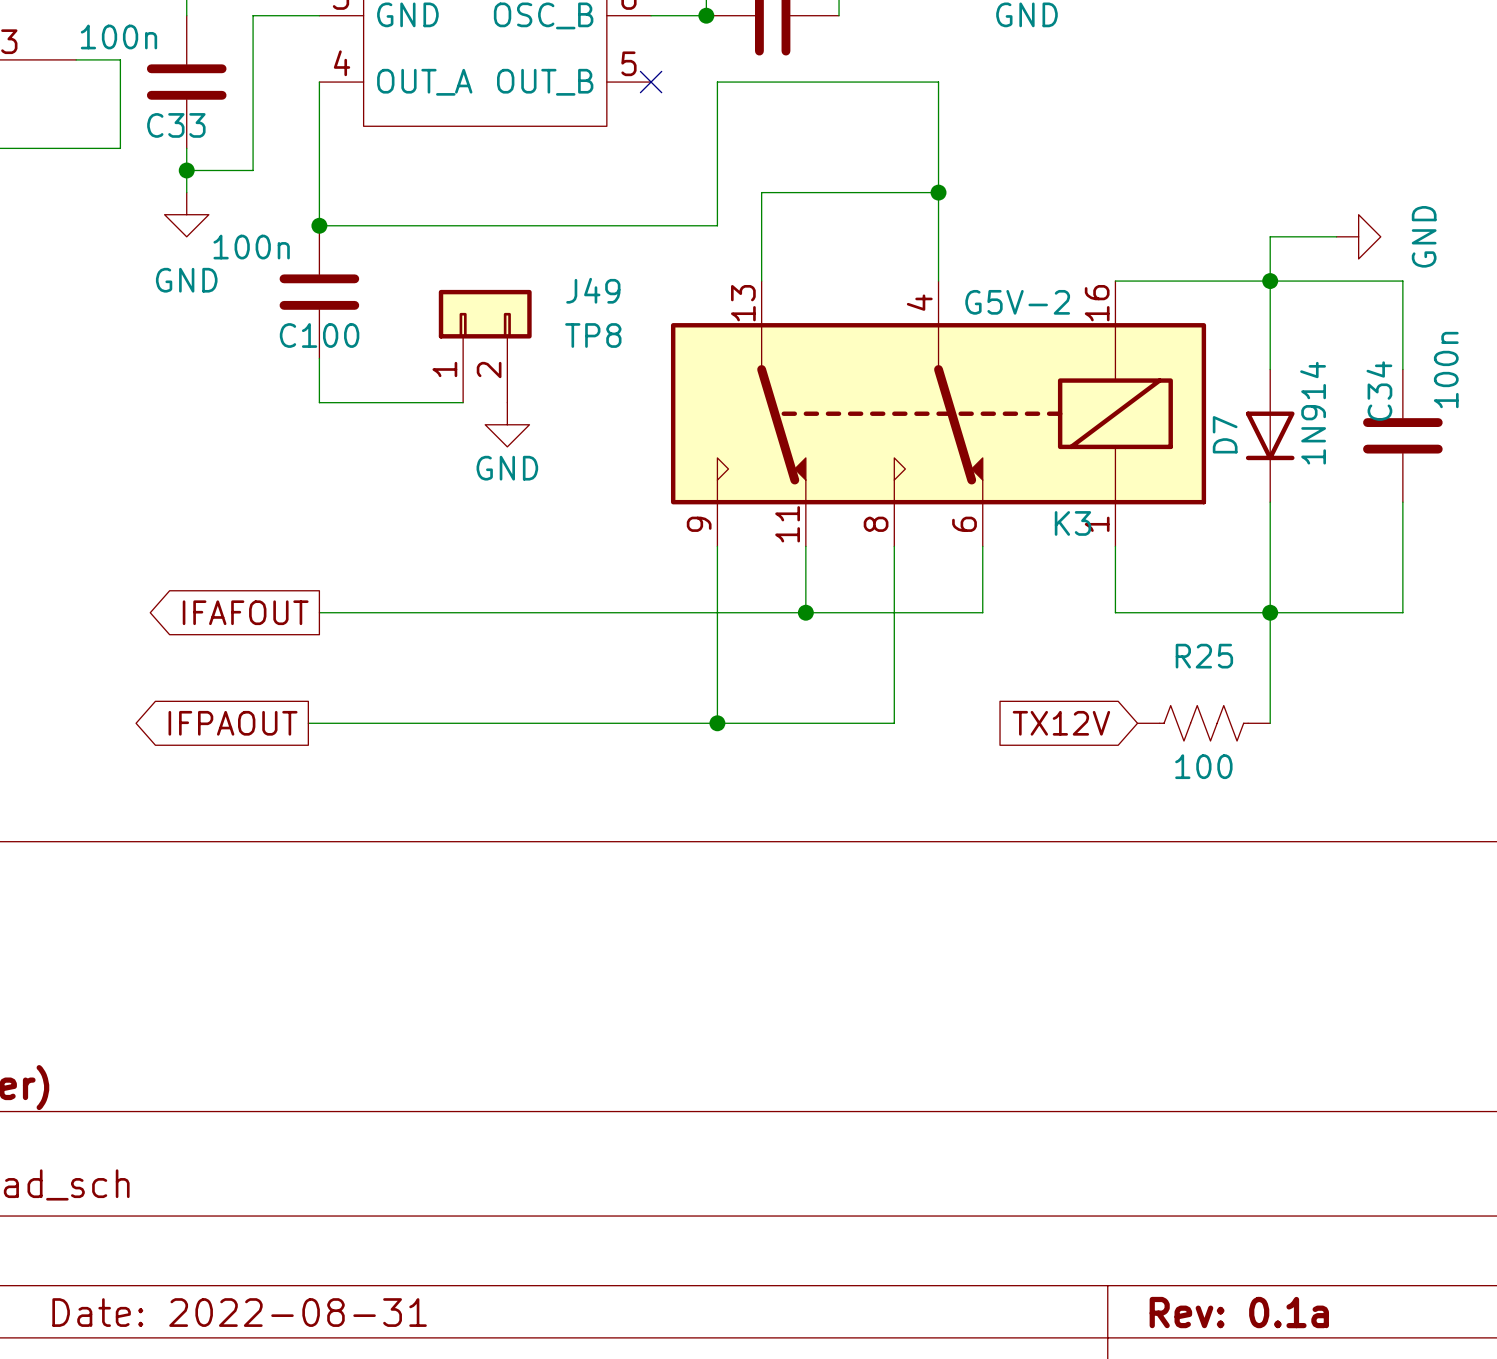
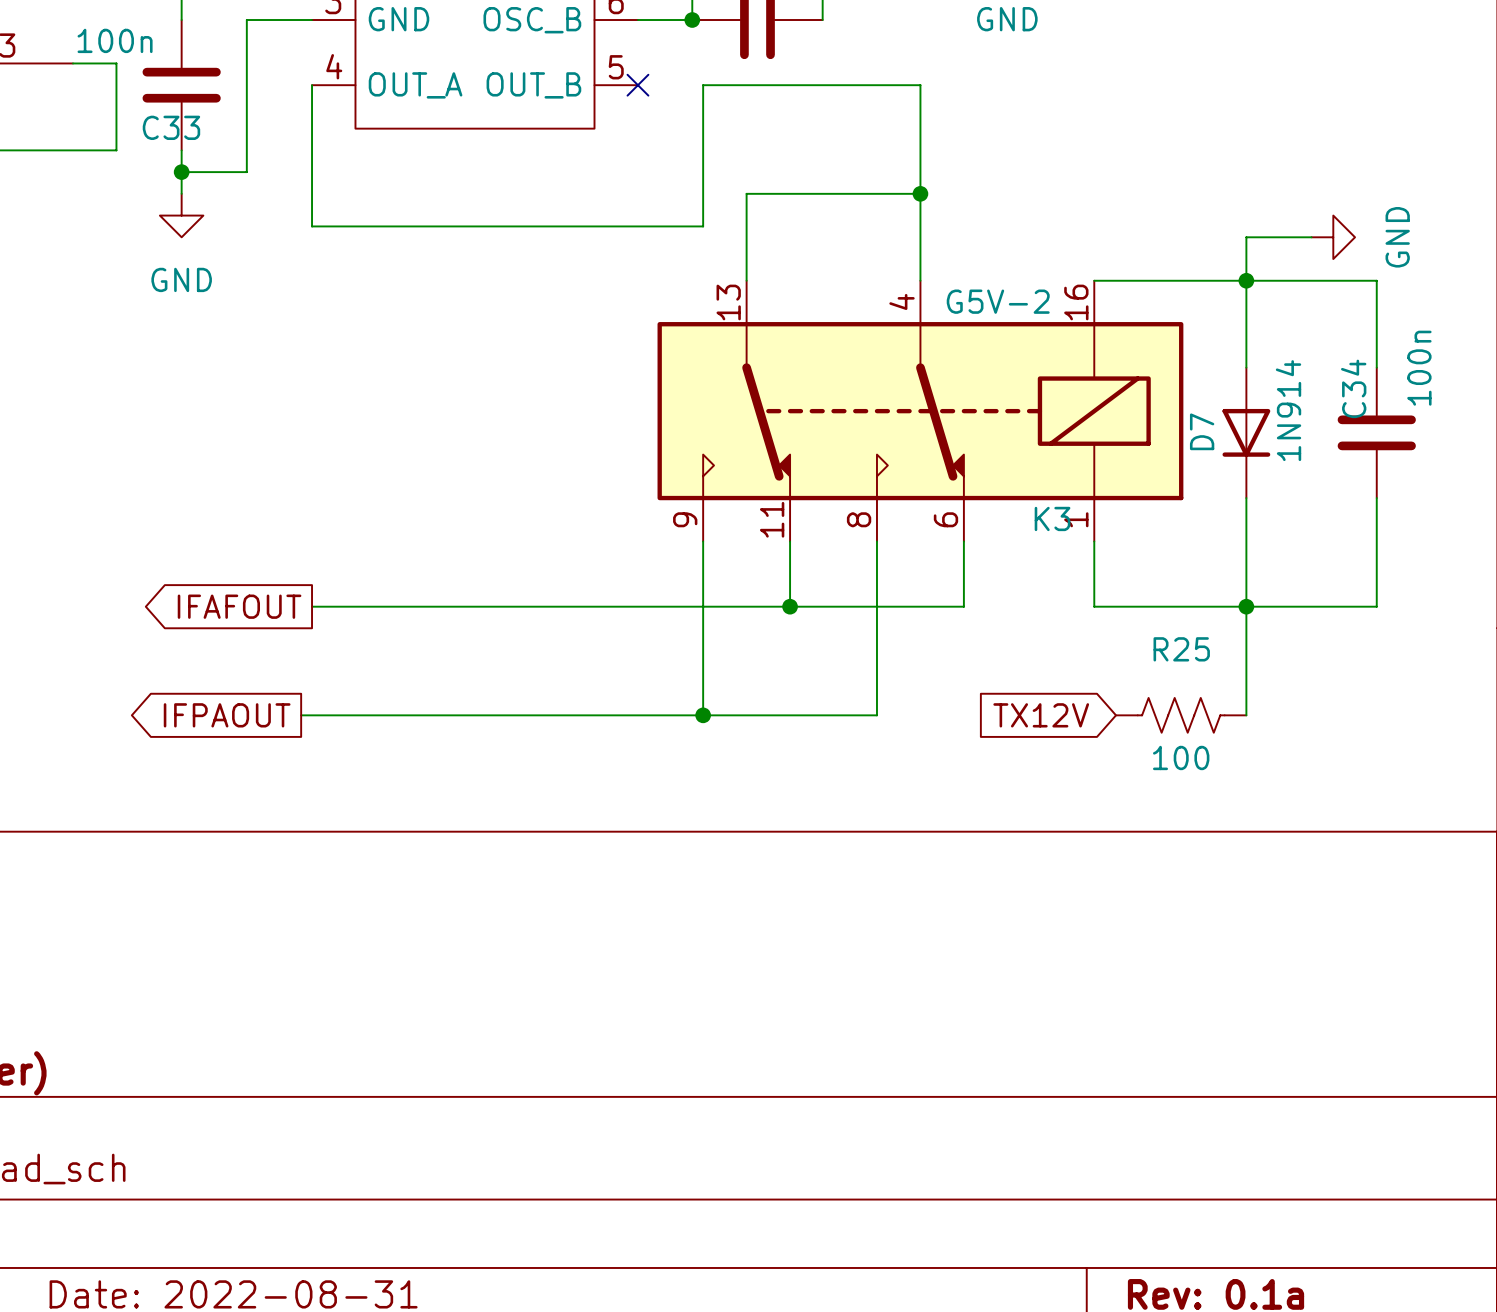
junction: (319, 225) -> none
C100: 100n (319, 292) -> none
J49: TP8 (485, 346) -> none
wire: (319, 358) (319, 402) (463, 402) -> none
power symbol: GND (507, 424) -> none

